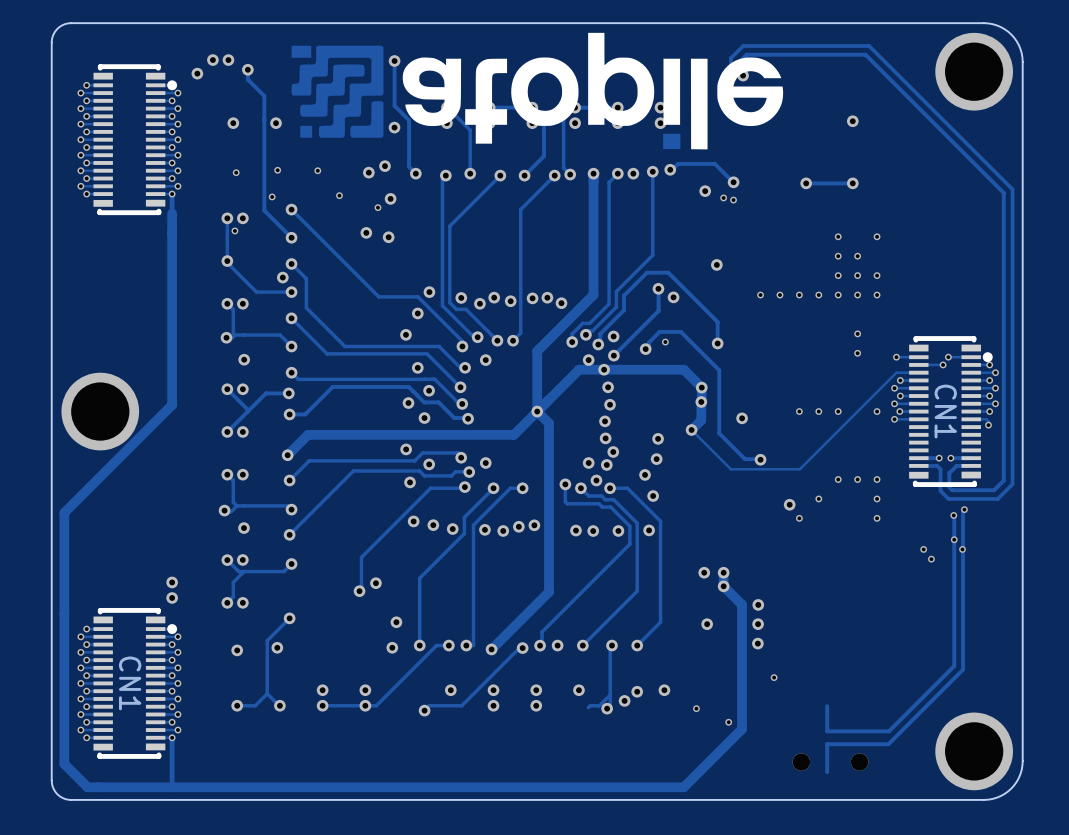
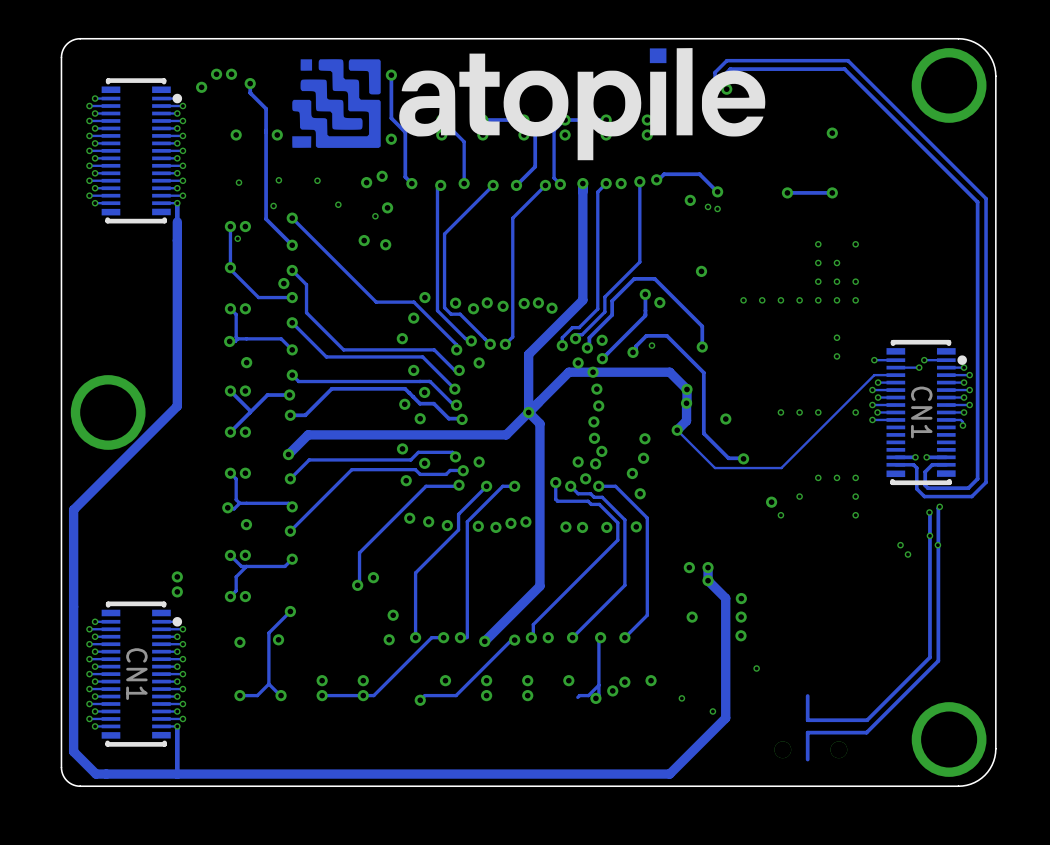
drawing shape: [291, 32, 784, 150] -> [292, 48, 766, 161]

